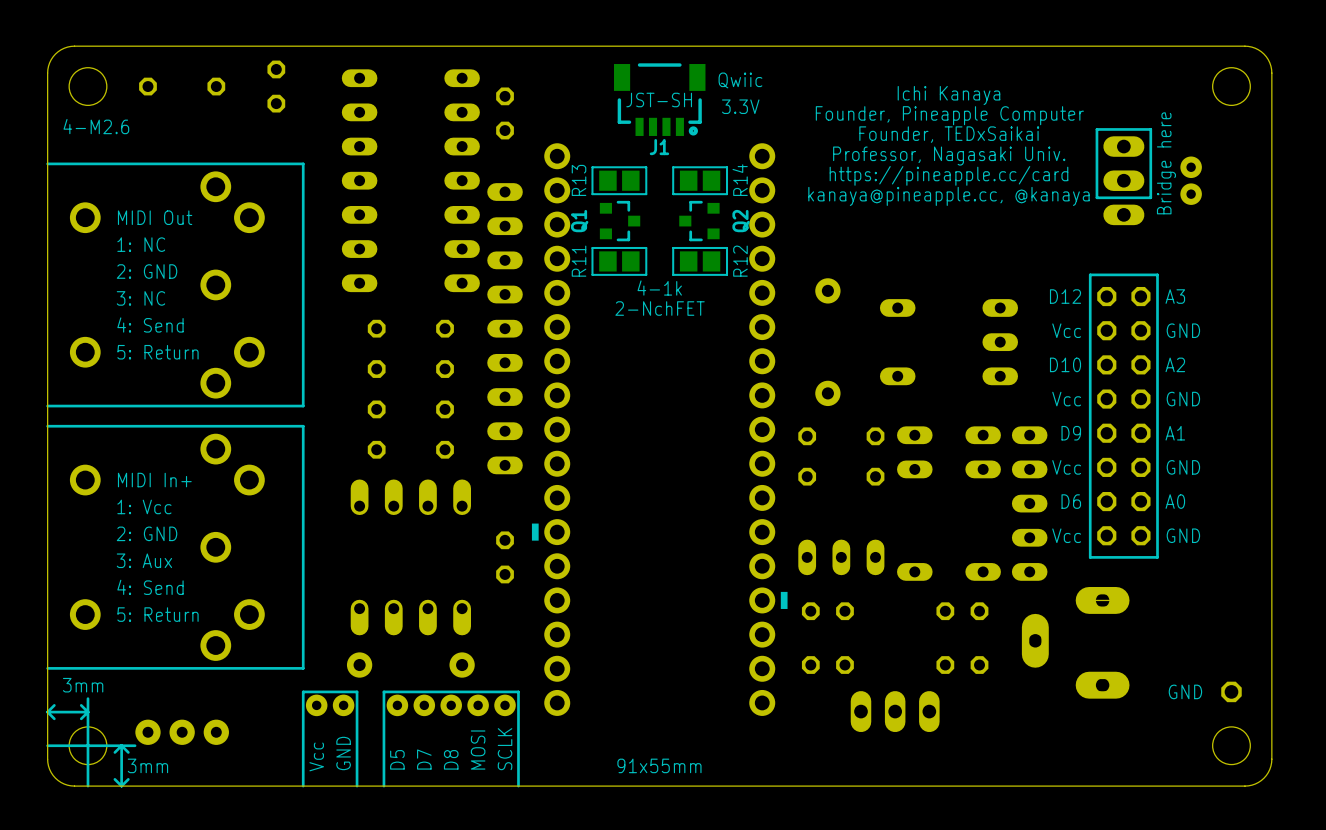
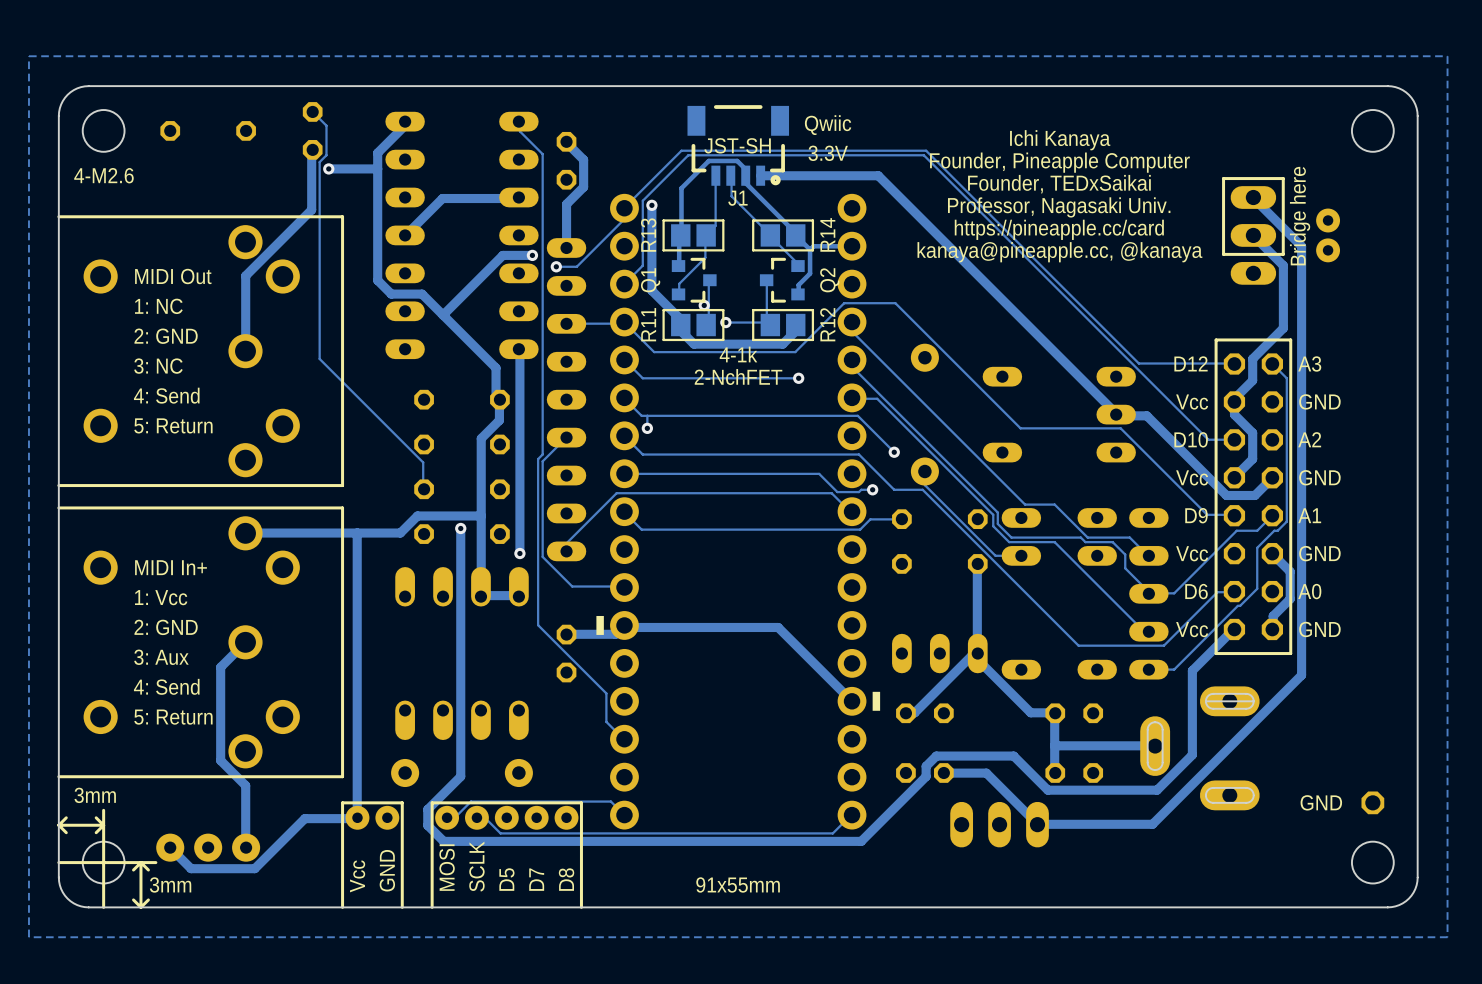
zone outline: none -> (1447, 56) (28, 56) (28, 937) (1447, 937) (1447, 56)
track: none -> (312, 112) (326, 125) (326, 155) (319, 162) (319, 358) (423, 462) (424, 489)
track: none -> (405, 121) (405, 125) (377, 153) (377, 280) (391, 294) (422, 294) (496, 368) (496, 396) (499, 399) (499, 420) (481, 438) (480, 596) (518, 596)
track: none -> (518, 121) (519, 131) (542, 154) (542, 454) (538, 459) (538, 625) (606, 693) (606, 721) (624, 739)
track: none -> (566, 141) (583, 159) (583, 187) (566, 204) (566, 247)
track: none -> (312, 149) (311, 209) (245, 275) (245, 350)
via: none -> (328, 168)
track: none -> (377, 168) (328, 168)
track: none -> (715, 175) (715, 225) (705, 236) (705, 257) (679, 283) (678, 294)
track: none -> (730, 175) (731, 196) (797, 263) (797, 266)
track: none -> (760, 175) (878, 175) (1116, 414) (1146, 415) (1226, 495) (1254, 495) (1272, 477)
track: none -> (518, 197) (442, 198) (405, 235)
track: none -> (1253, 197) (1301, 246) (1301, 675) (1152, 824) (1037, 824) (986, 773) (943, 772)
track: none -> (651, 205) (651, 290) (678, 316) (681, 331) (694, 344) (782, 344) (795, 331) (795, 325)
via: none -> (651, 205)
track: none -> (1253, 235) (1283, 265) (1283, 328) (1252, 358) (1252, 380) (1235, 397) (1234, 401)
track: none -> (852, 246) (813, 246) (810, 249)
track: none -> (810, 249) (810, 273) (798, 284) (797, 294)
track: none -> (810, 249) (746, 183) (745, 168) (737, 160) (708, 160) (681, 188) (681, 233) (679, 237) (678, 266)
track: none -> (532, 255) (502, 255) (443, 315)
via: none -> (532, 255)
track: none -> (556, 266) (576, 266) (623, 220) (623, 208) (681, 150) (926, 150) (1138, 363) (1234, 364)
via: none -> (556, 266)
track: none -> (709, 280) (708, 322) (706, 325)
track: none -> (766, 280) (766, 321) (770, 324)
track: none -> (624, 283) (642, 265) (642, 200) (688, 155) (923, 155) (1208, 439) (1234, 439)
via: none -> (704, 305)
track: none -> (852, 322) (852, 331) (1025, 504) (1054, 504) (1087, 537) (1129, 537) (1148, 555)
track: none -> (725, 322) (766, 322) (770, 325)
via: none -> (725, 322)
track: none -> (566, 323) (622, 323) (624, 322) (654, 352) (795, 352) (844, 303) (895, 303) (1020, 428) (1120, 428) (1207, 514) (1234, 515)
track: none -> (518, 349) (519, 553)
track: none -> (624, 360) (642, 378) (798, 378)
track: none -> (852, 360) (852, 366) (997, 512) (997, 523) (1011, 537) (1080, 537) (1085, 542) (1112, 542) (1125, 554) (1125, 568) (1148, 593) (1174, 593) (1236, 530) (1257, 530) (1272, 515)
track: none -> (1272, 364) (1286, 378) (1286, 521) (1257, 547) (1257, 588) (1174, 669) (1149, 669)
via: none -> (798, 378)
track: none -> (624, 397) (641, 415) (857, 415) (894, 452)
track: none -> (852, 397) (877, 398) (993, 514) (993, 526) (1009, 542) (1054, 542) (1143, 630) (1148, 631)
track: none -> (1234, 402) (1234, 414) (1252, 432) (1252, 459) (1234, 477)
track: none -> (647, 415) (647, 428)
via: none -> (647, 428)
track: none -> (624, 435) (642, 454) (858, 454) (894, 489) (922, 489) (1078, 645) (1163, 645) (1217, 592) (1234, 591)
track: none -> (566, 437) (542, 461) (542, 556) (572, 586) (624, 587)
via: none -> (894, 452)
track: none -> (924, 471) (924, 485) (995, 555) (1021, 555)
track: none -> (624, 473) (819, 473) (837, 492) (872, 489)
via: none -> (872, 489)
track: none -> (624, 511) (641, 529) (860, 529) (870, 519) (901, 519)
track: none -> (852, 511) (831, 493) (616, 493) (566, 543) (566, 551)
track: none -> (481, 515) (417, 515) (400, 533) (245, 533)
track: none -> (460, 528) (460, 776) (427, 809) (427, 825) (443, 841) (861, 841) (926, 776) (926, 766) (936, 756) (1013, 756) (1047, 790) (1157, 790) (1192, 754) (1192, 670) (1234, 629)
via: none -> (460, 528)
track: none -> (357, 533) (357, 818) (304, 818) (254, 868) (191, 868) (170, 847)
via: none -> (519, 553)
track: none -> (1272, 553) (1290, 571) (1290, 599) (1273, 616) (1272, 629)
track: none -> (977, 563) (977, 653)
track: none -> (566, 634) (615, 634) (624, 625) (628, 627) (778, 627) (852, 701)
track: none -> (245, 642) (220, 667) (220, 760) (245, 785) (246, 847)
track: none -> (977, 653) (971, 655) (914, 712) (905, 713)
track: none -> (977, 653) (978, 660) (1030, 712) (1055, 713) (1055, 772)
track: none -> (1054, 745) (1155, 746)
track: none -> (624, 815) (610, 801) (470, 801) (455, 817) (447, 817)
track: none -> (852, 815) (832, 833) (500, 833) (485, 818) (476, 817)
text: SCLK (505, 749) -> D8 (566, 879)
text: MOSI (478, 750) -> D7 (536, 879)
text: D5 (397, 759) -> MOSI (447, 867)
text: D7 (424, 759) -> SCLK (476, 866)
text: D8 (451, 759) -> D5 (506, 879)

